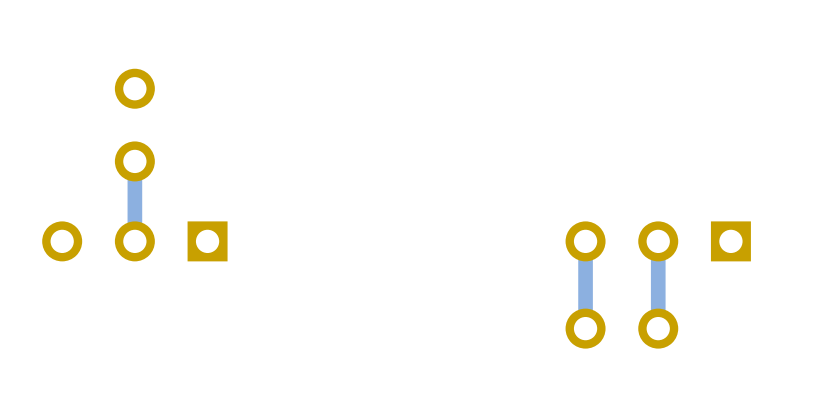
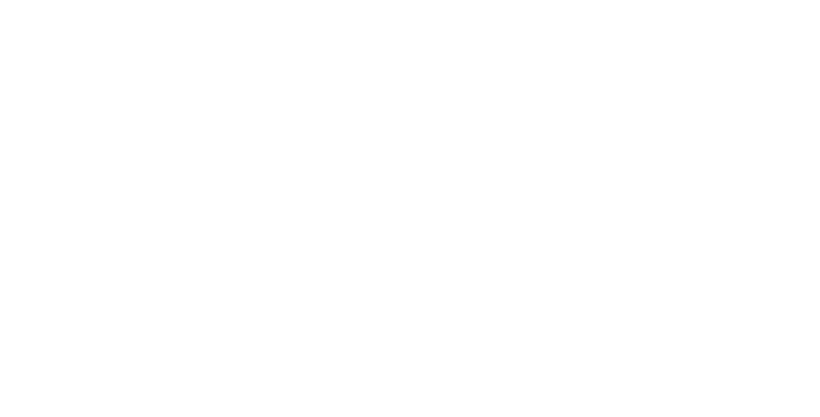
part: (134, 125) -> none
bottom track: (134, 161) (134, 241) -> none
part: (134, 241) -> none
bottom track: (585, 241) (585, 328) -> none
bottom track: (658, 241) (658, 328) -> none
part: (658, 241) -> none
part: (621, 328) -> none

